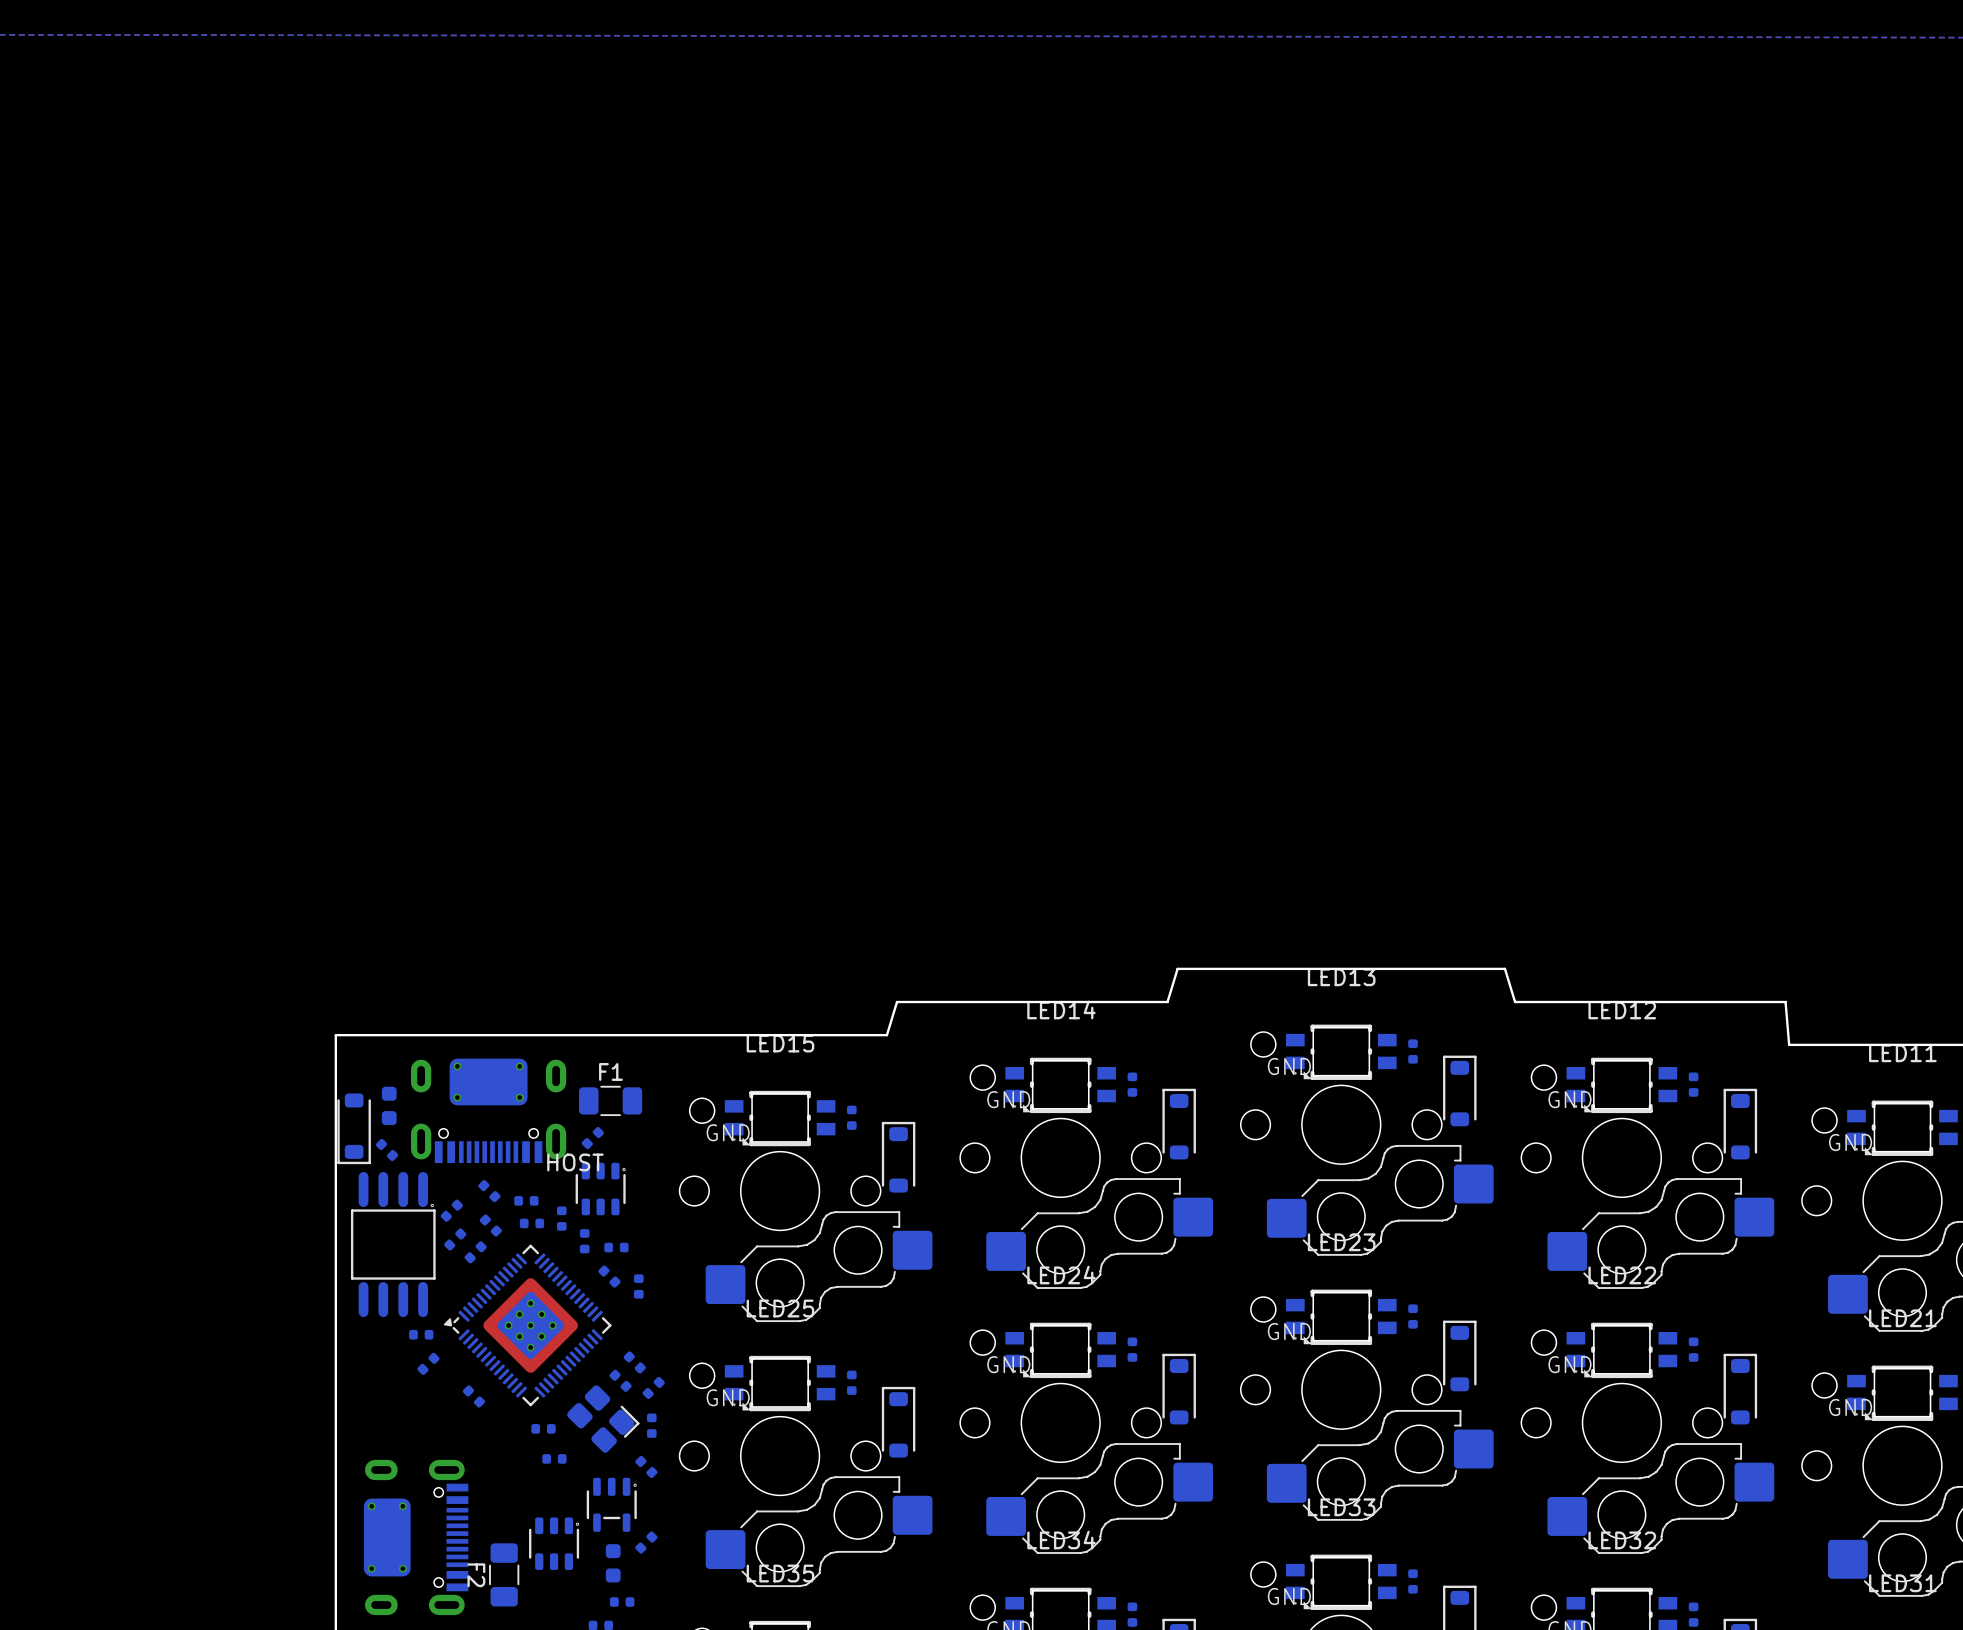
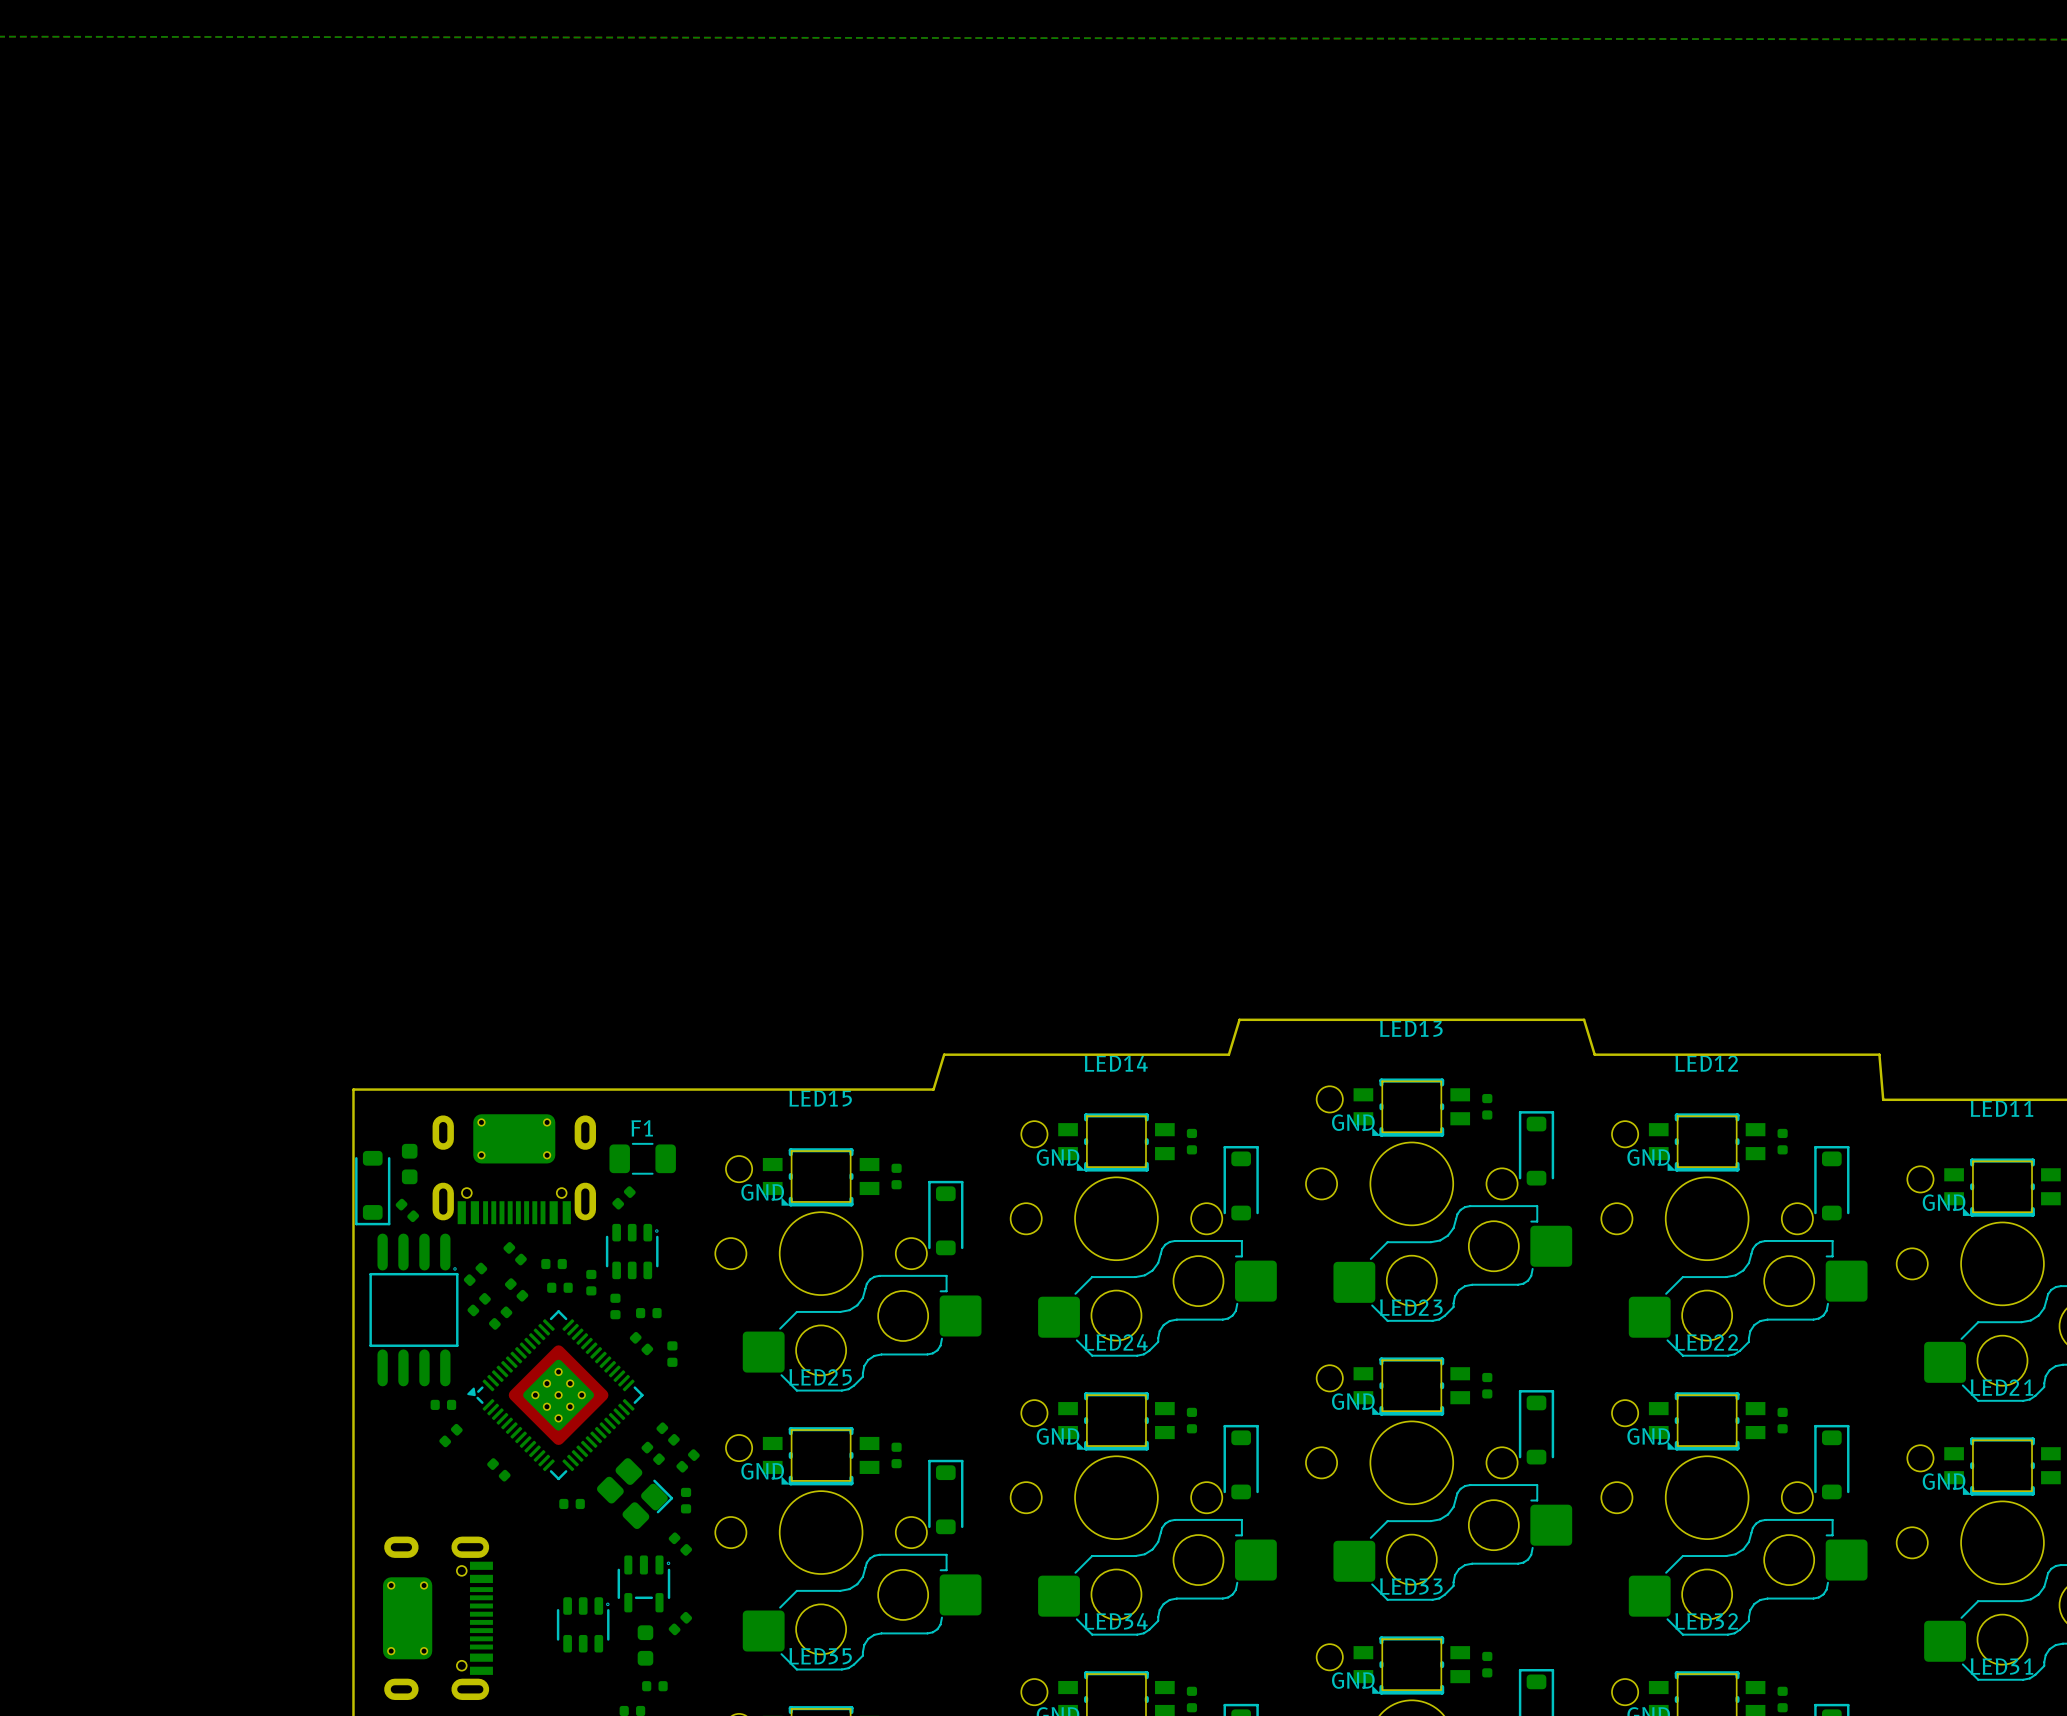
text: HOST (575, 1162) -> none
part: (554, 1458) -> none
F2: (504, 1574) -> none

